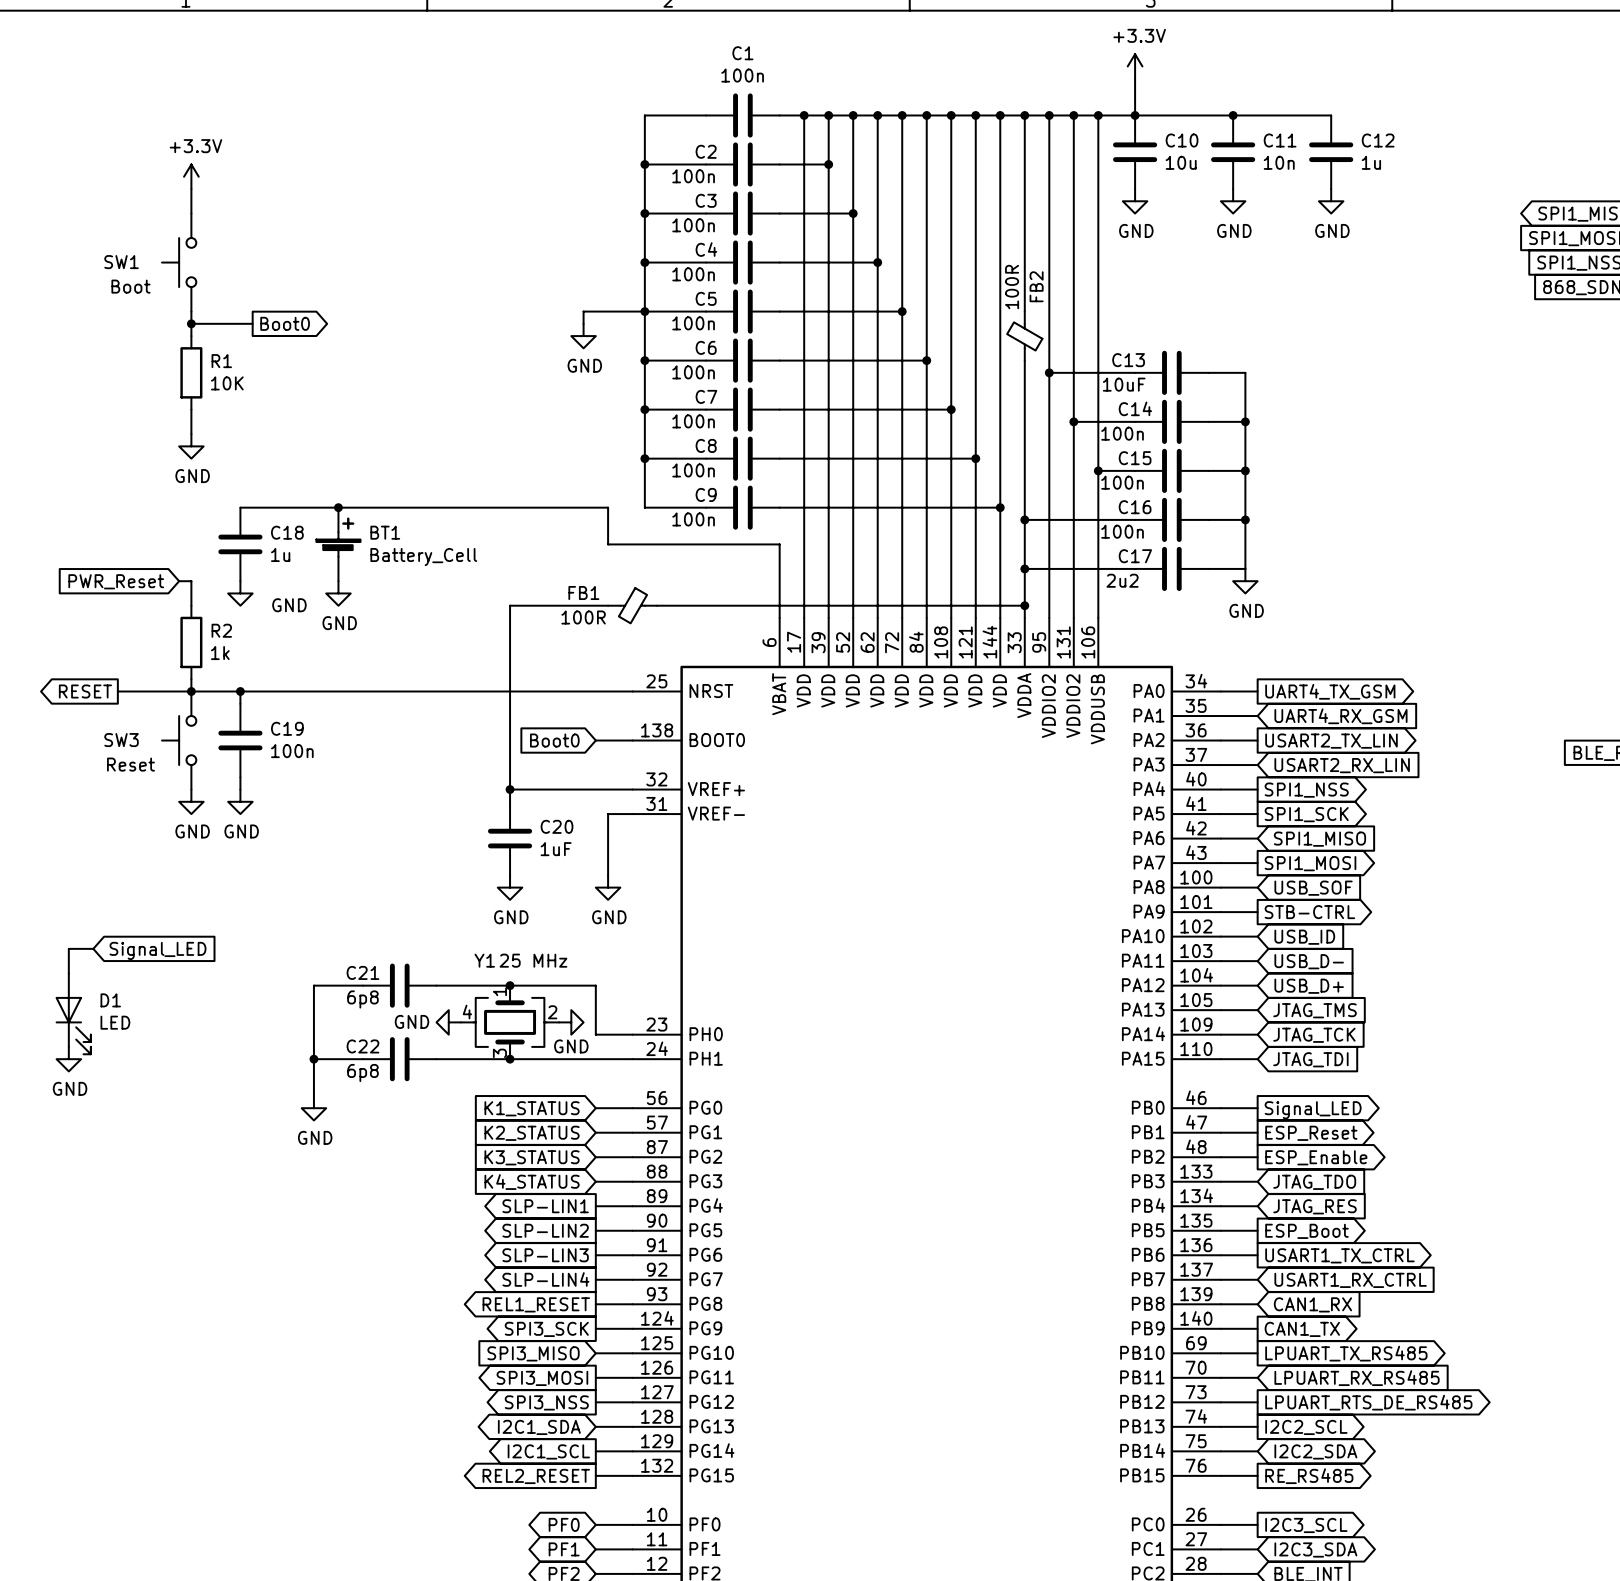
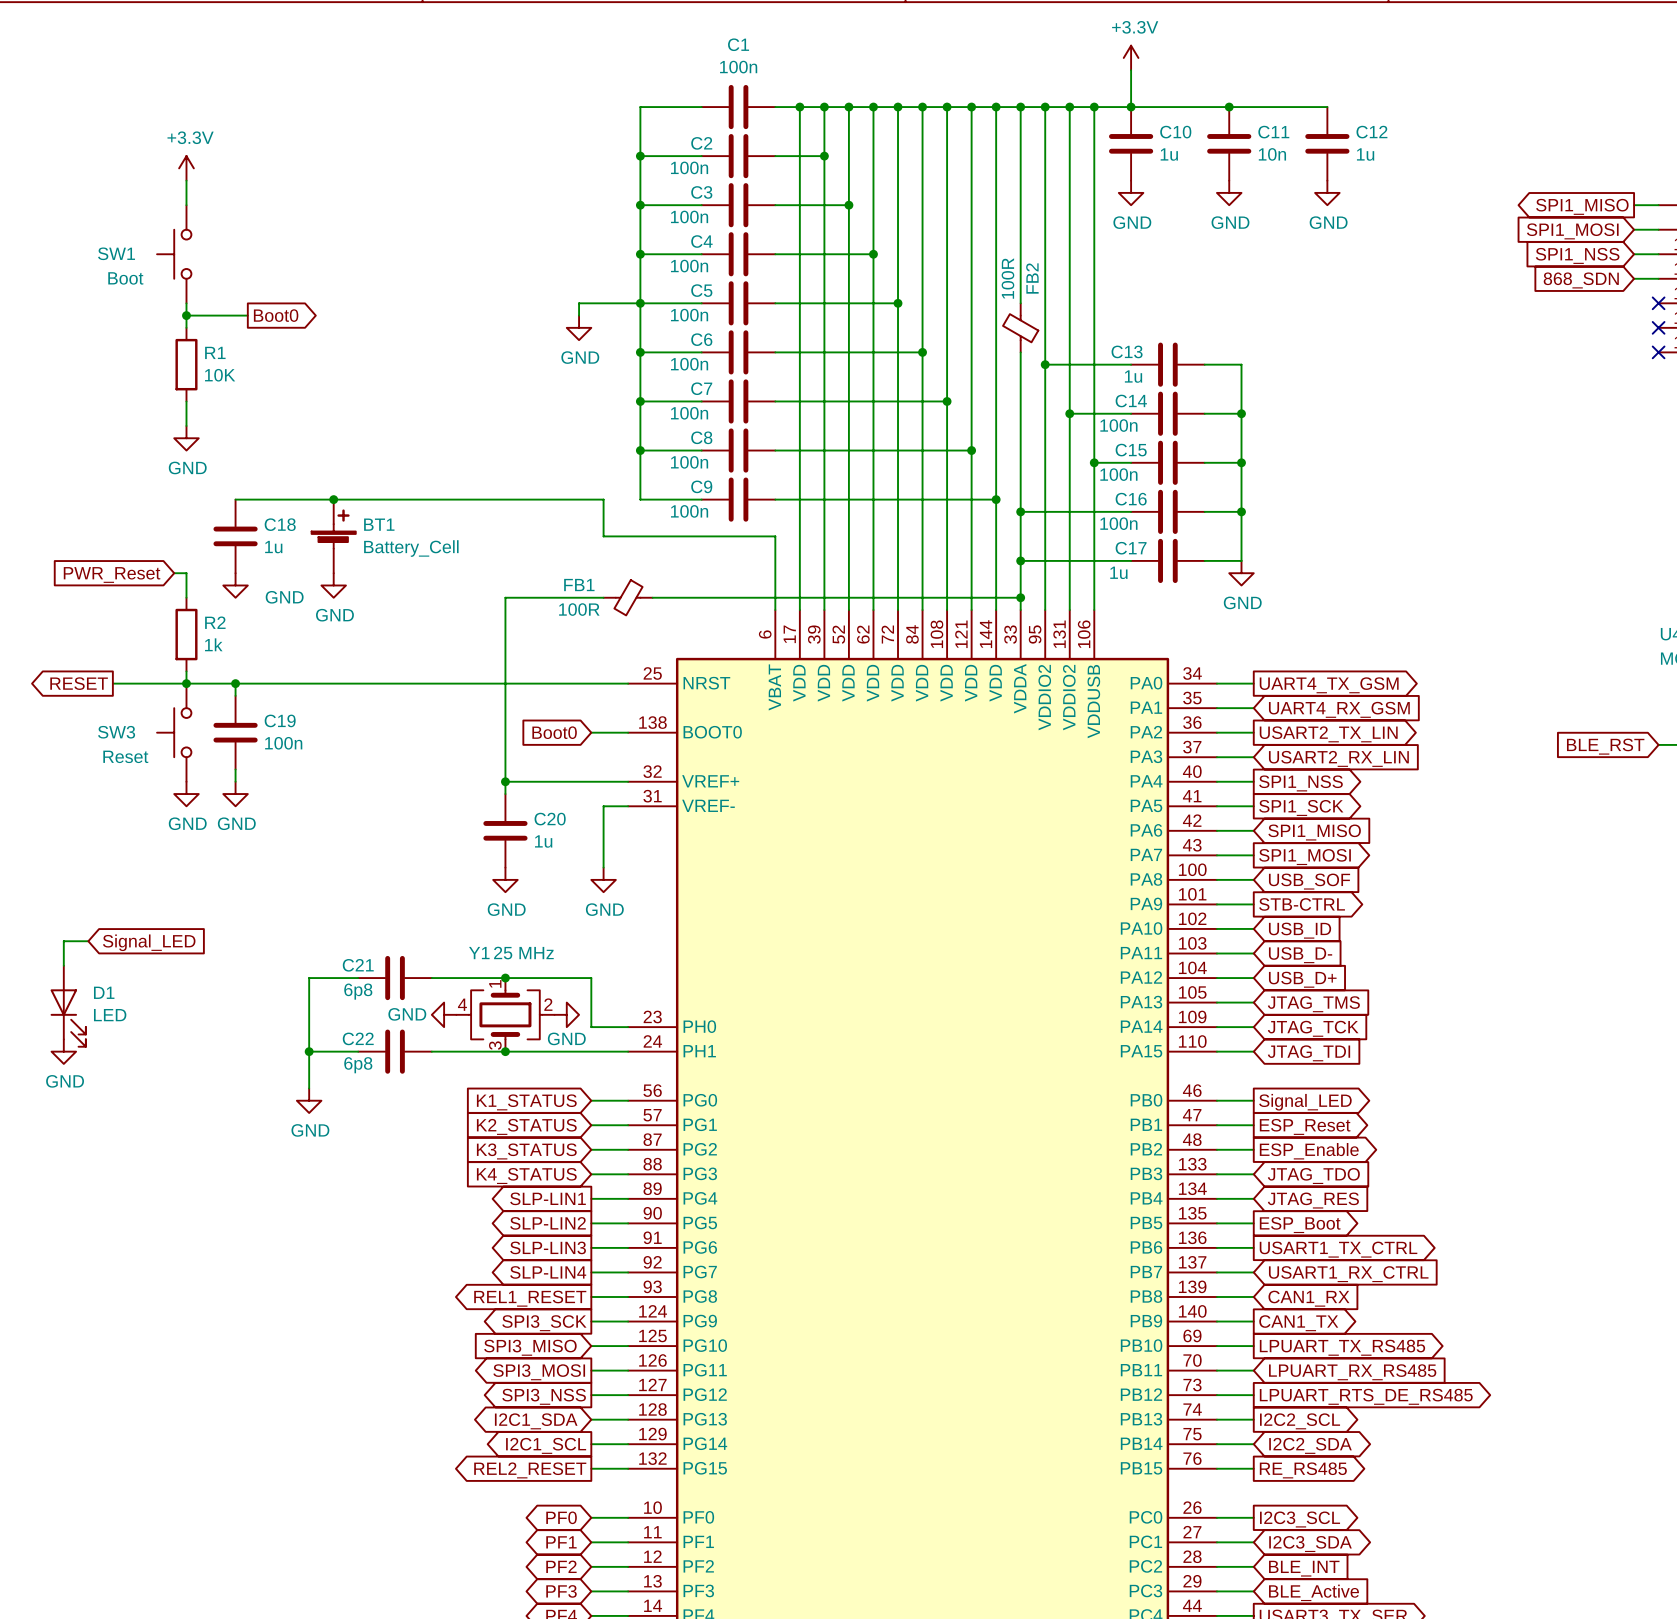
C10 value: 10u (1181, 162) -> 1u (1169, 154)
C13 value: 10uF (1124, 384) -> 1u (1133, 376)
C17 value: 2u2 (1122, 580) -> 1u (1118, 572)
C20 value: 1uF (556, 849) -> 1u (543, 841)

